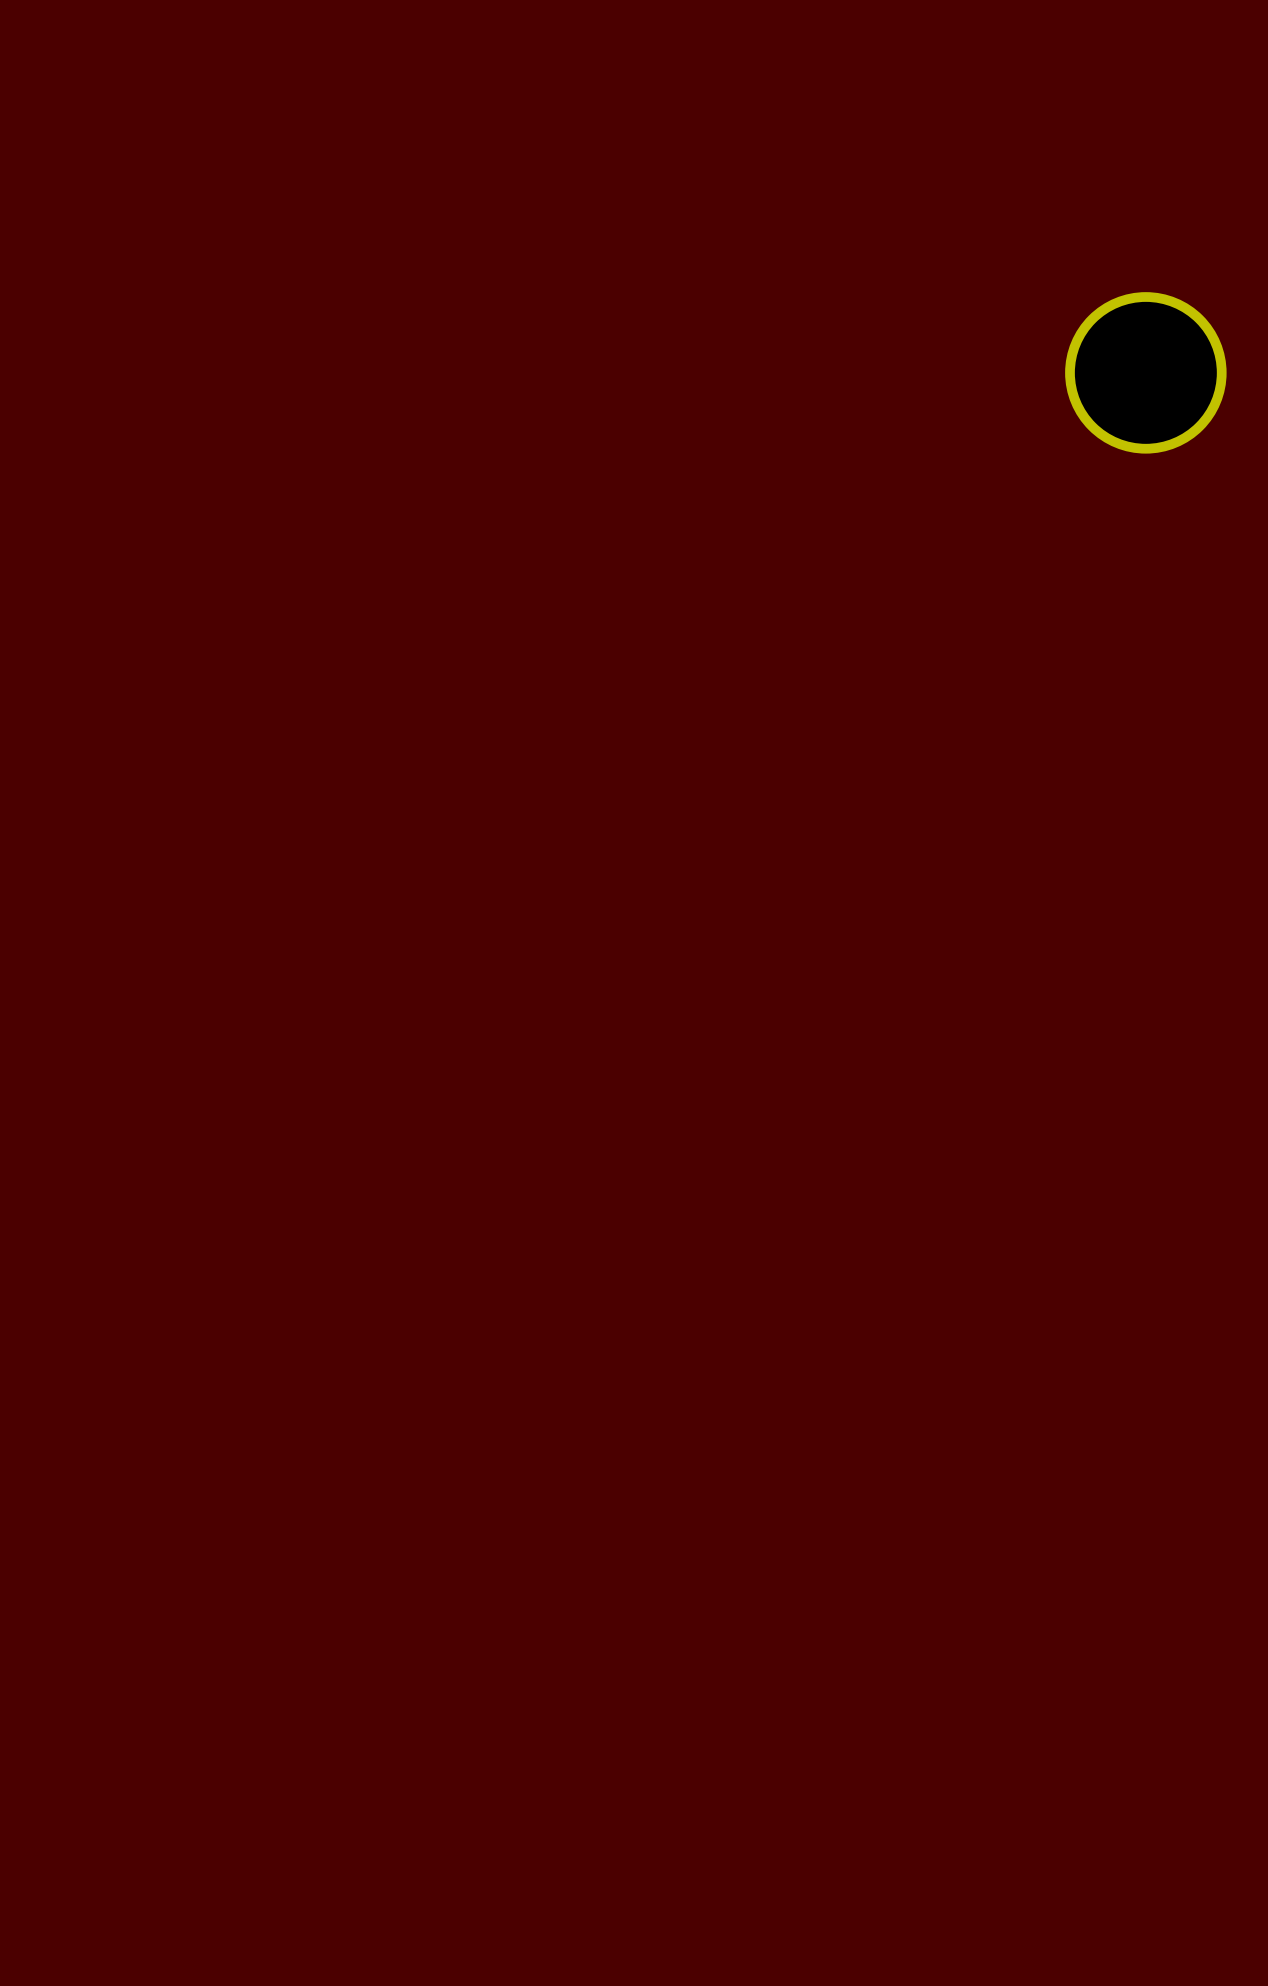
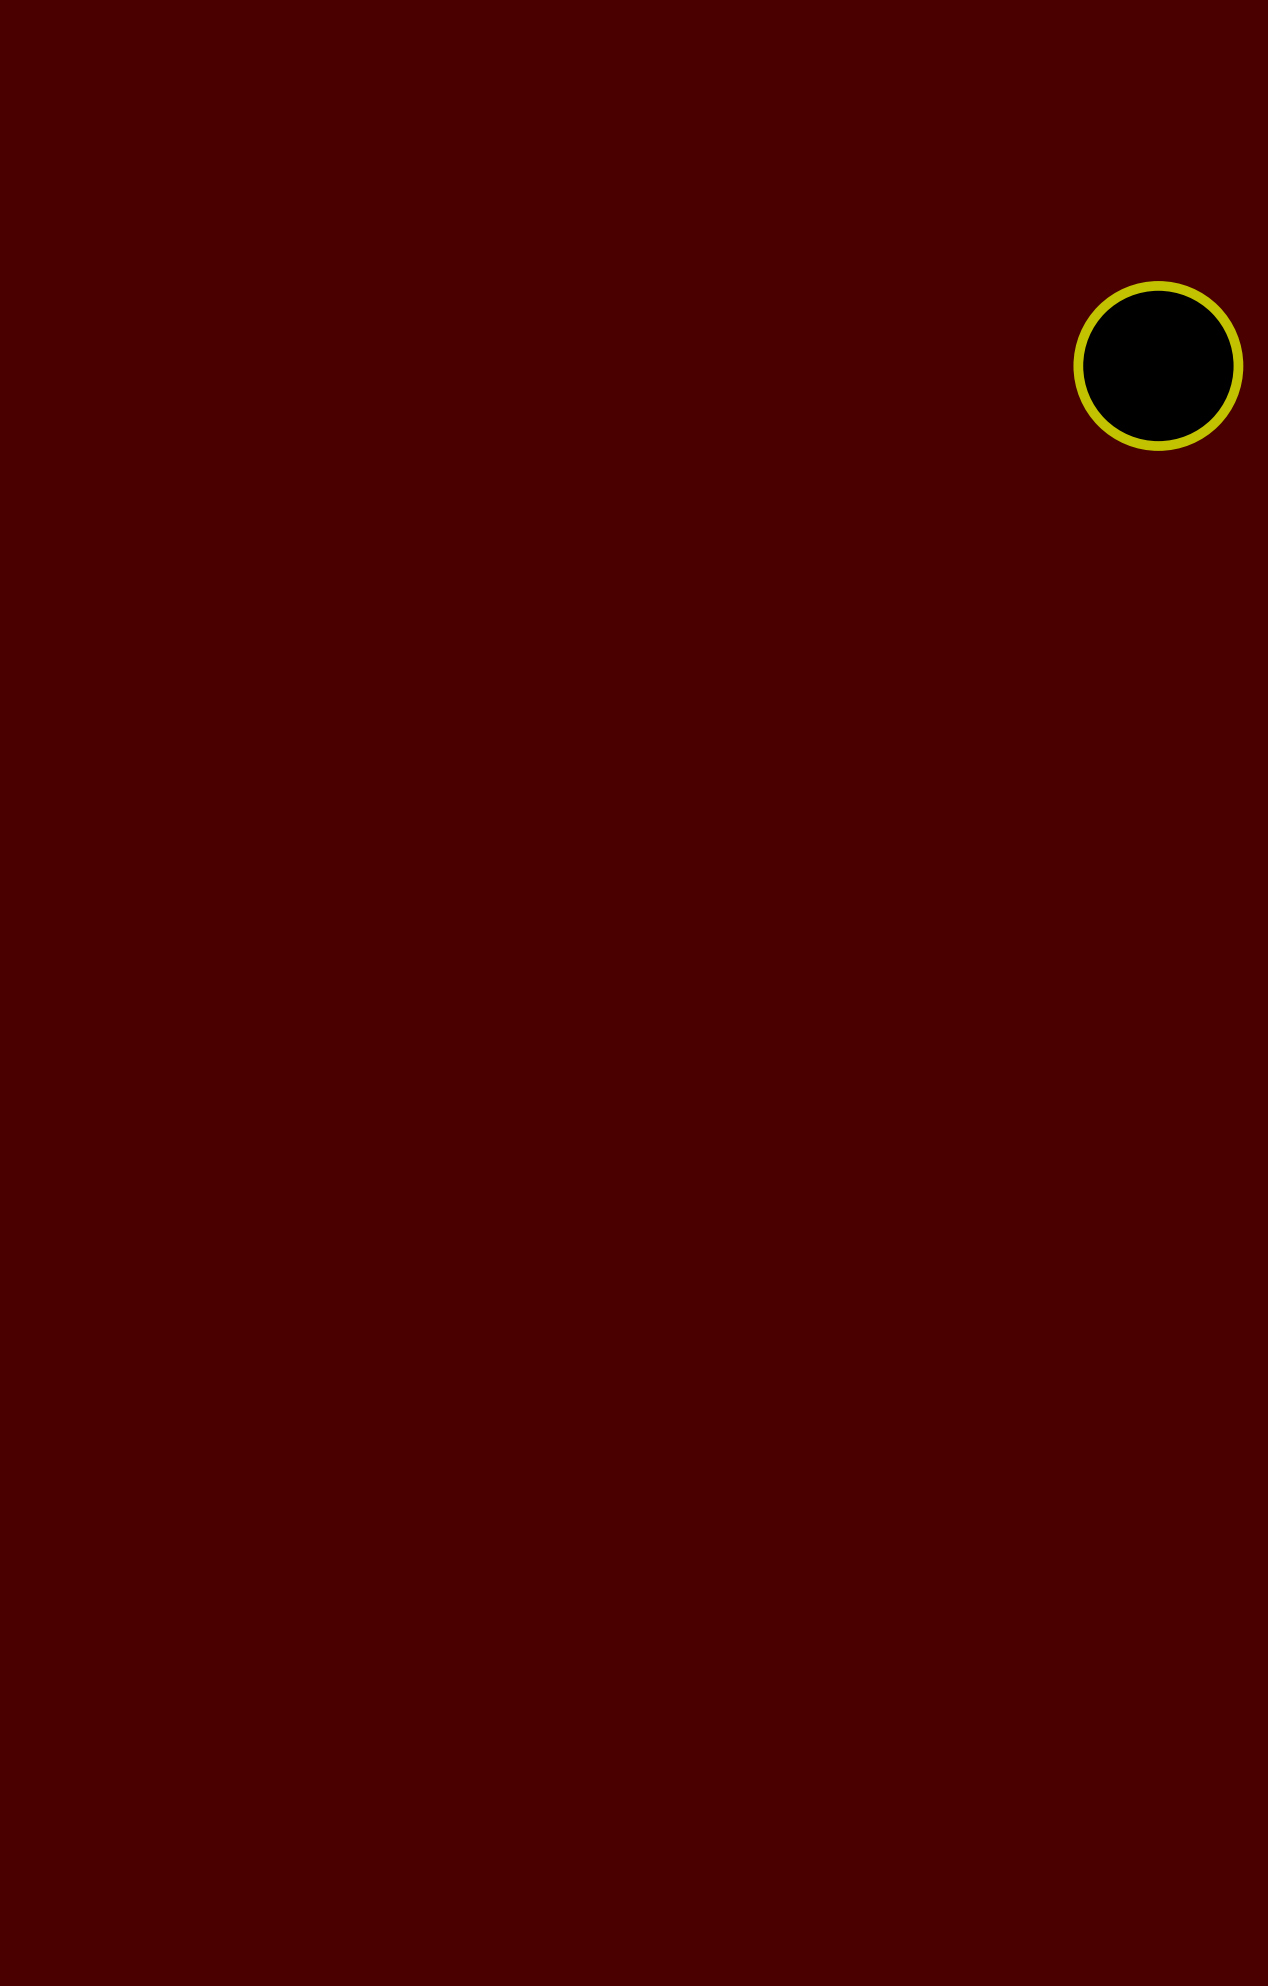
round board edge size: [1065, 292, 1227, 454] -> [1073, 281, 1244, 451]

